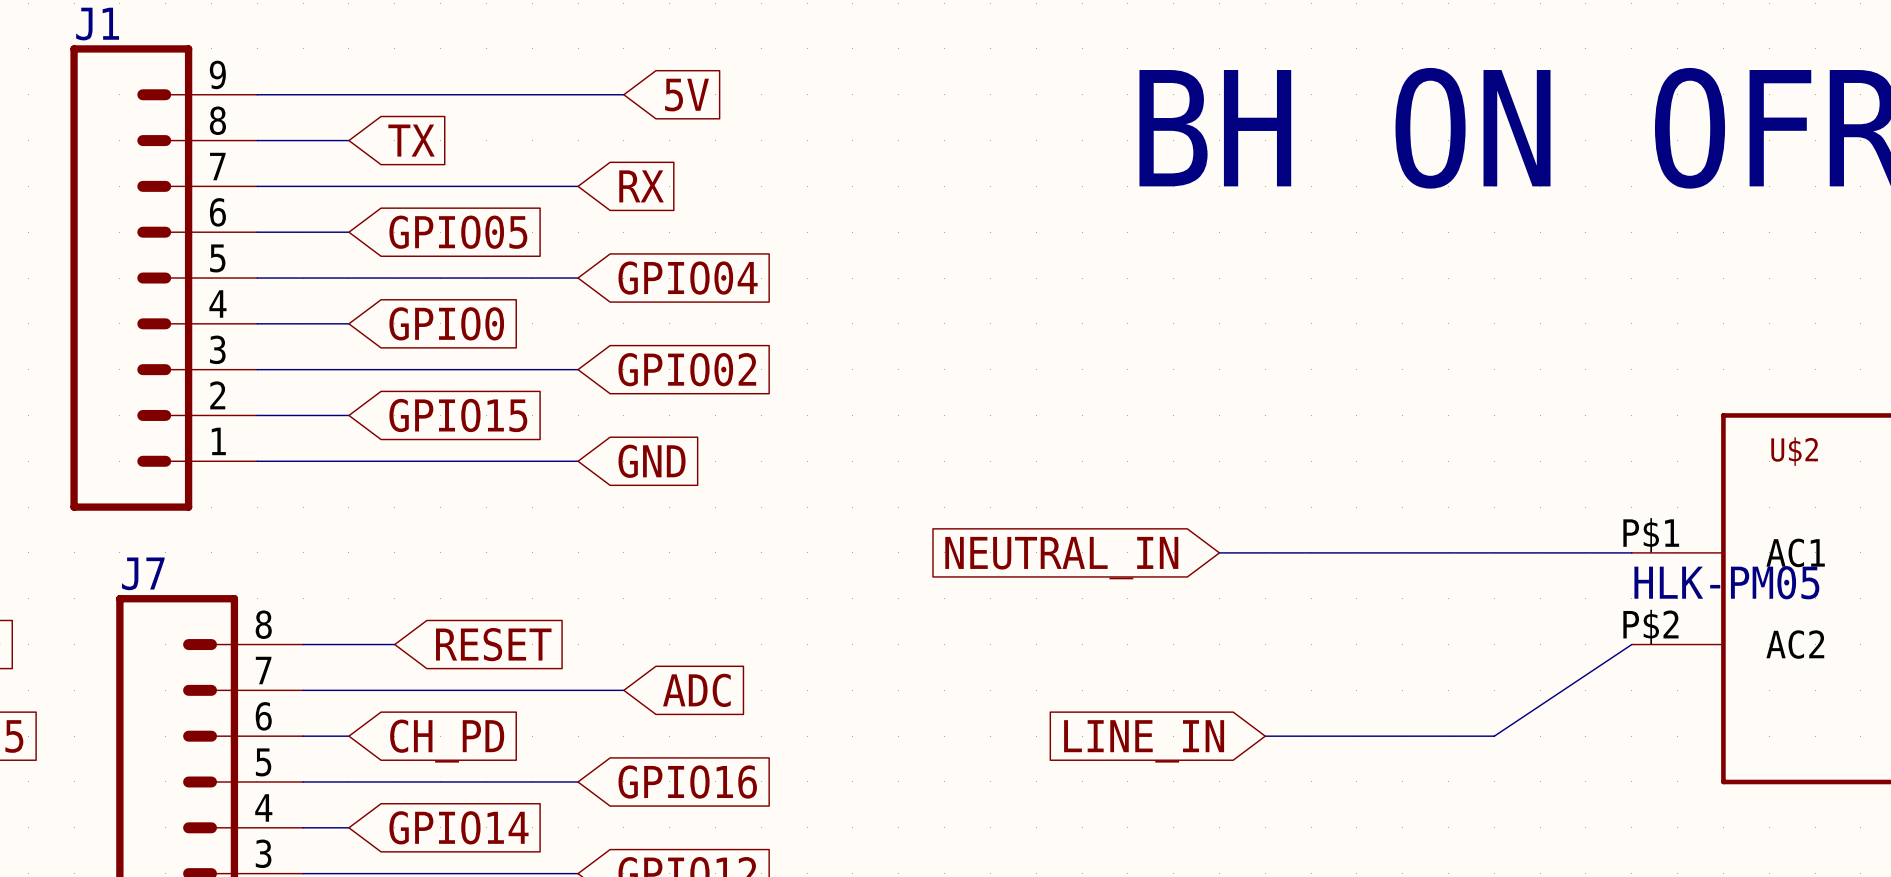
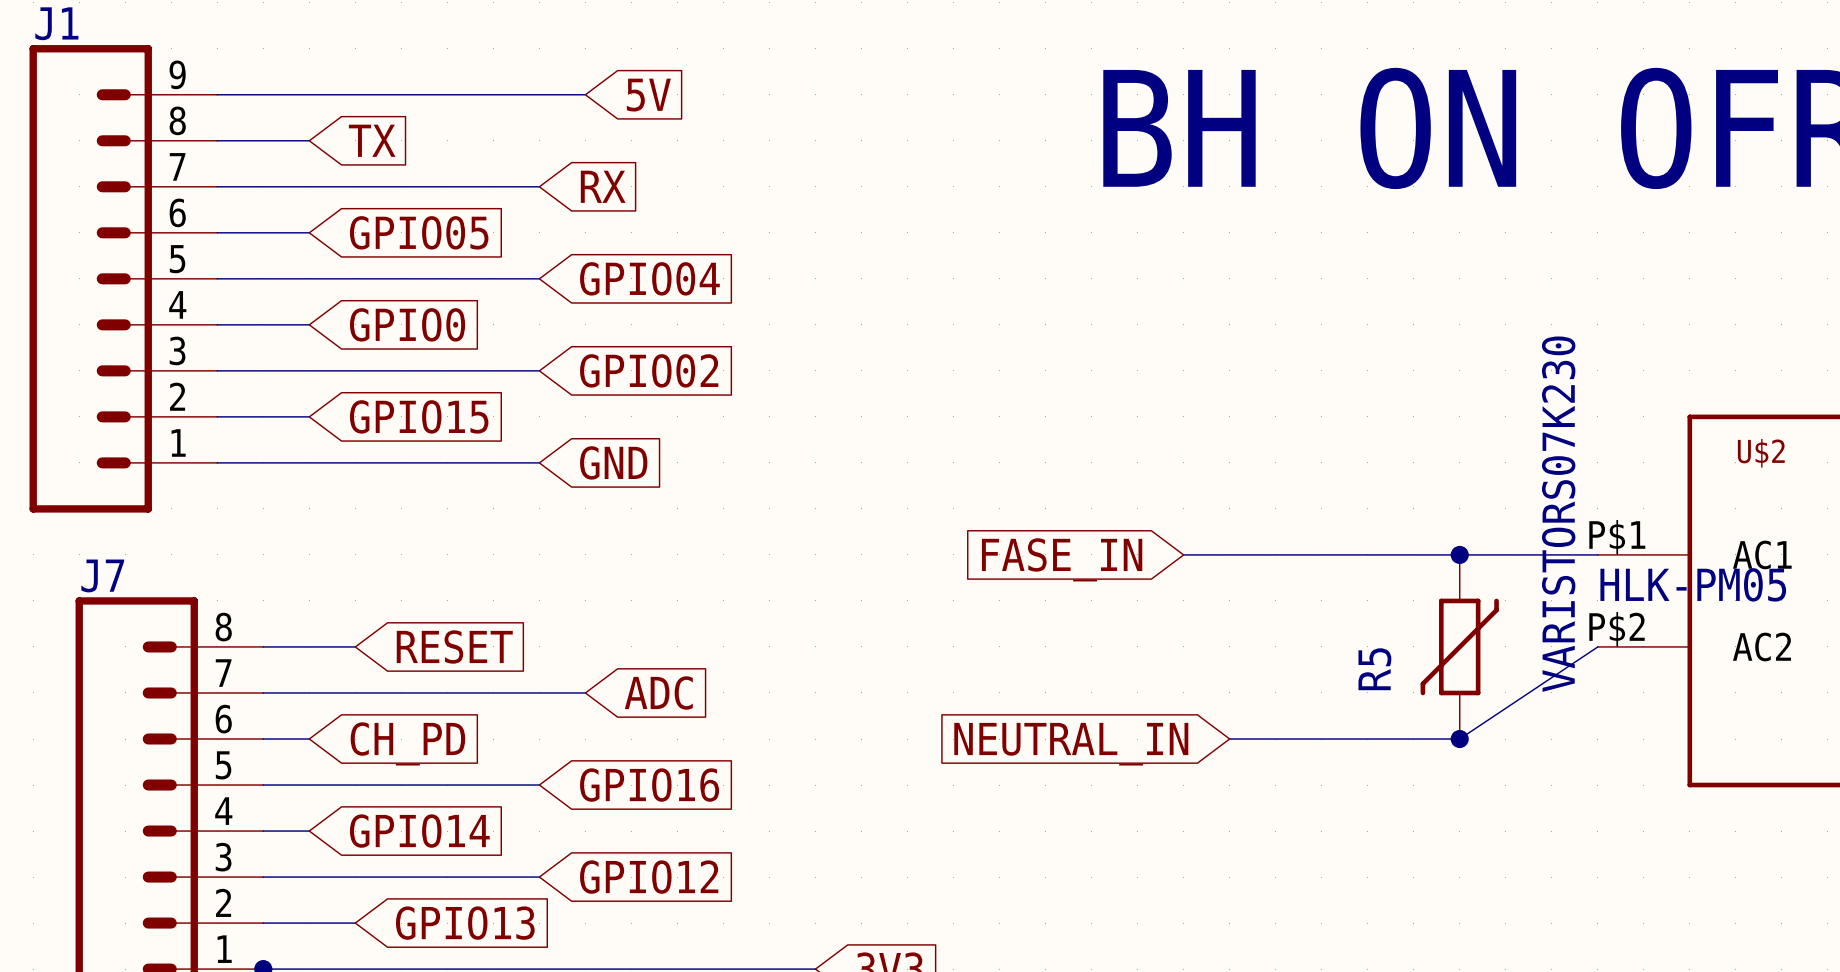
junction: none -> (1459, 554)
global label: NEUTRAL_IN (1061, 558) -> FASE_IN (1062, 559)
R5: none -> VARISTORS07K230 (1459, 646)
junction: none -> (1459, 739)
global label: LINE_IN (1144, 741) -> NEUTRAL_IN (1071, 744)

